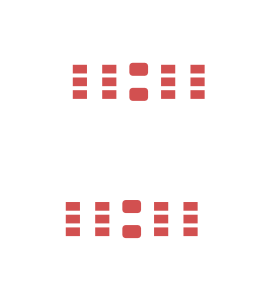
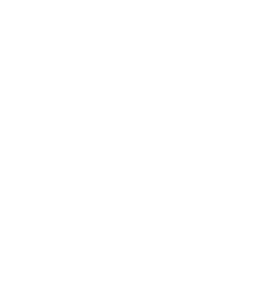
part: (94, 81) -> none
part: (138, 81) -> none
part: (182, 81) -> none
part: (87, 219) -> none
part: (131, 219) -> none
part: (175, 219) -> none

